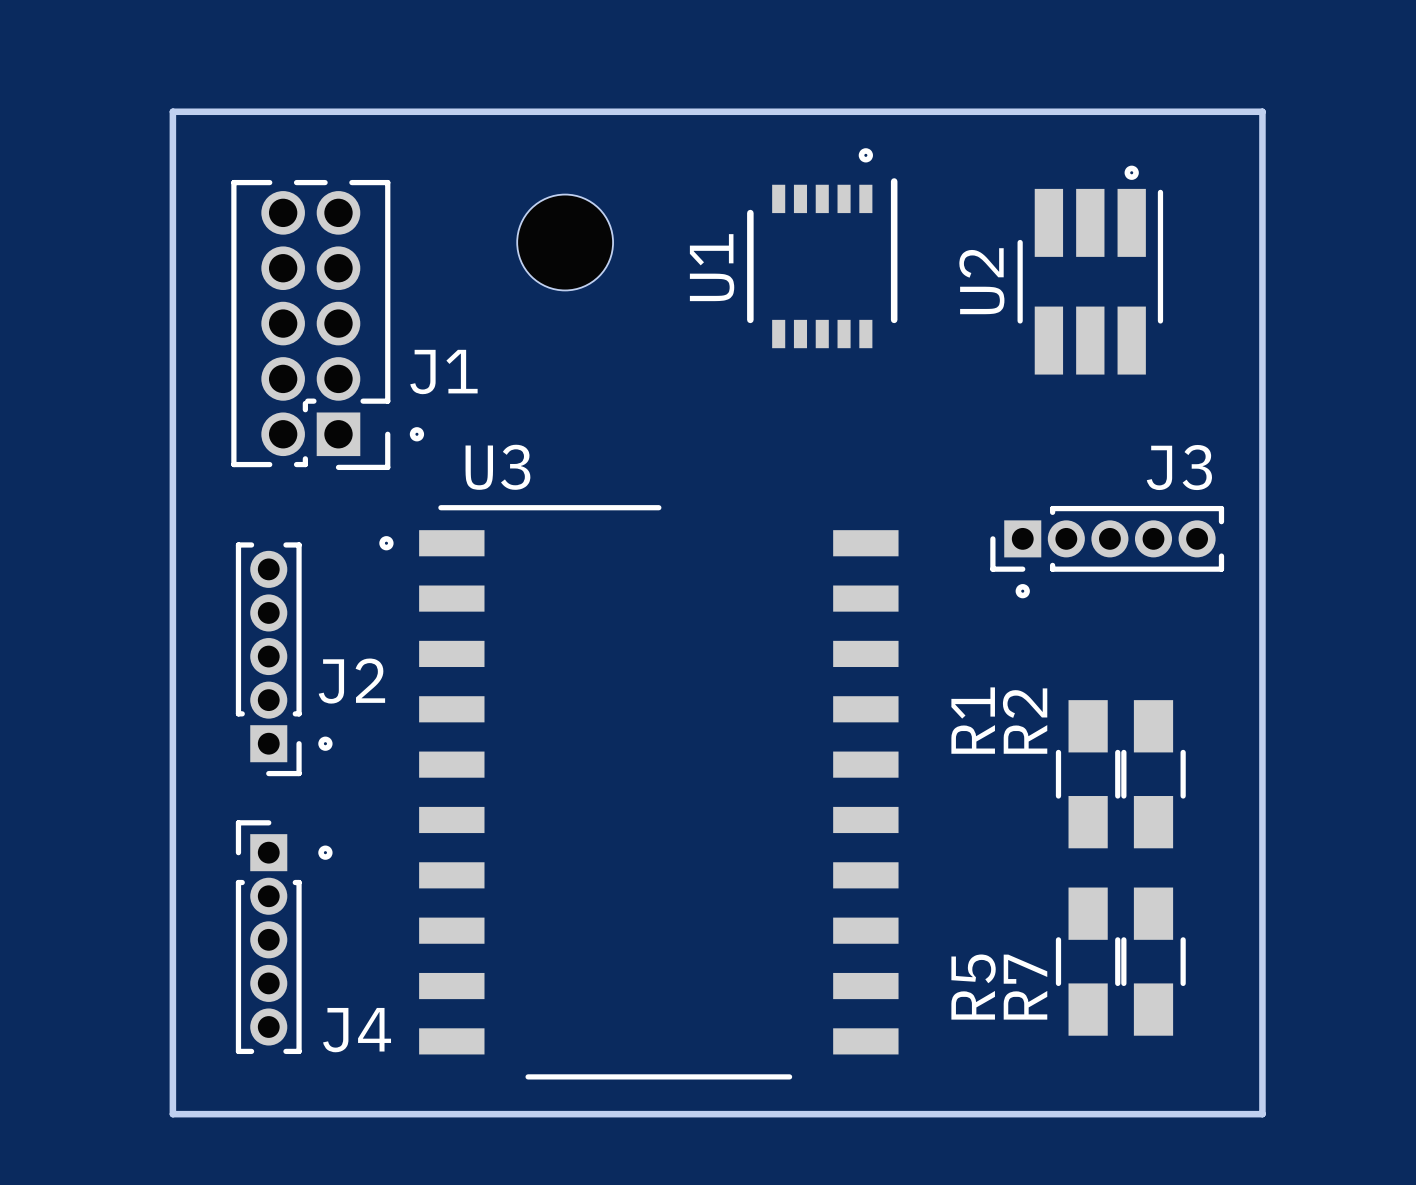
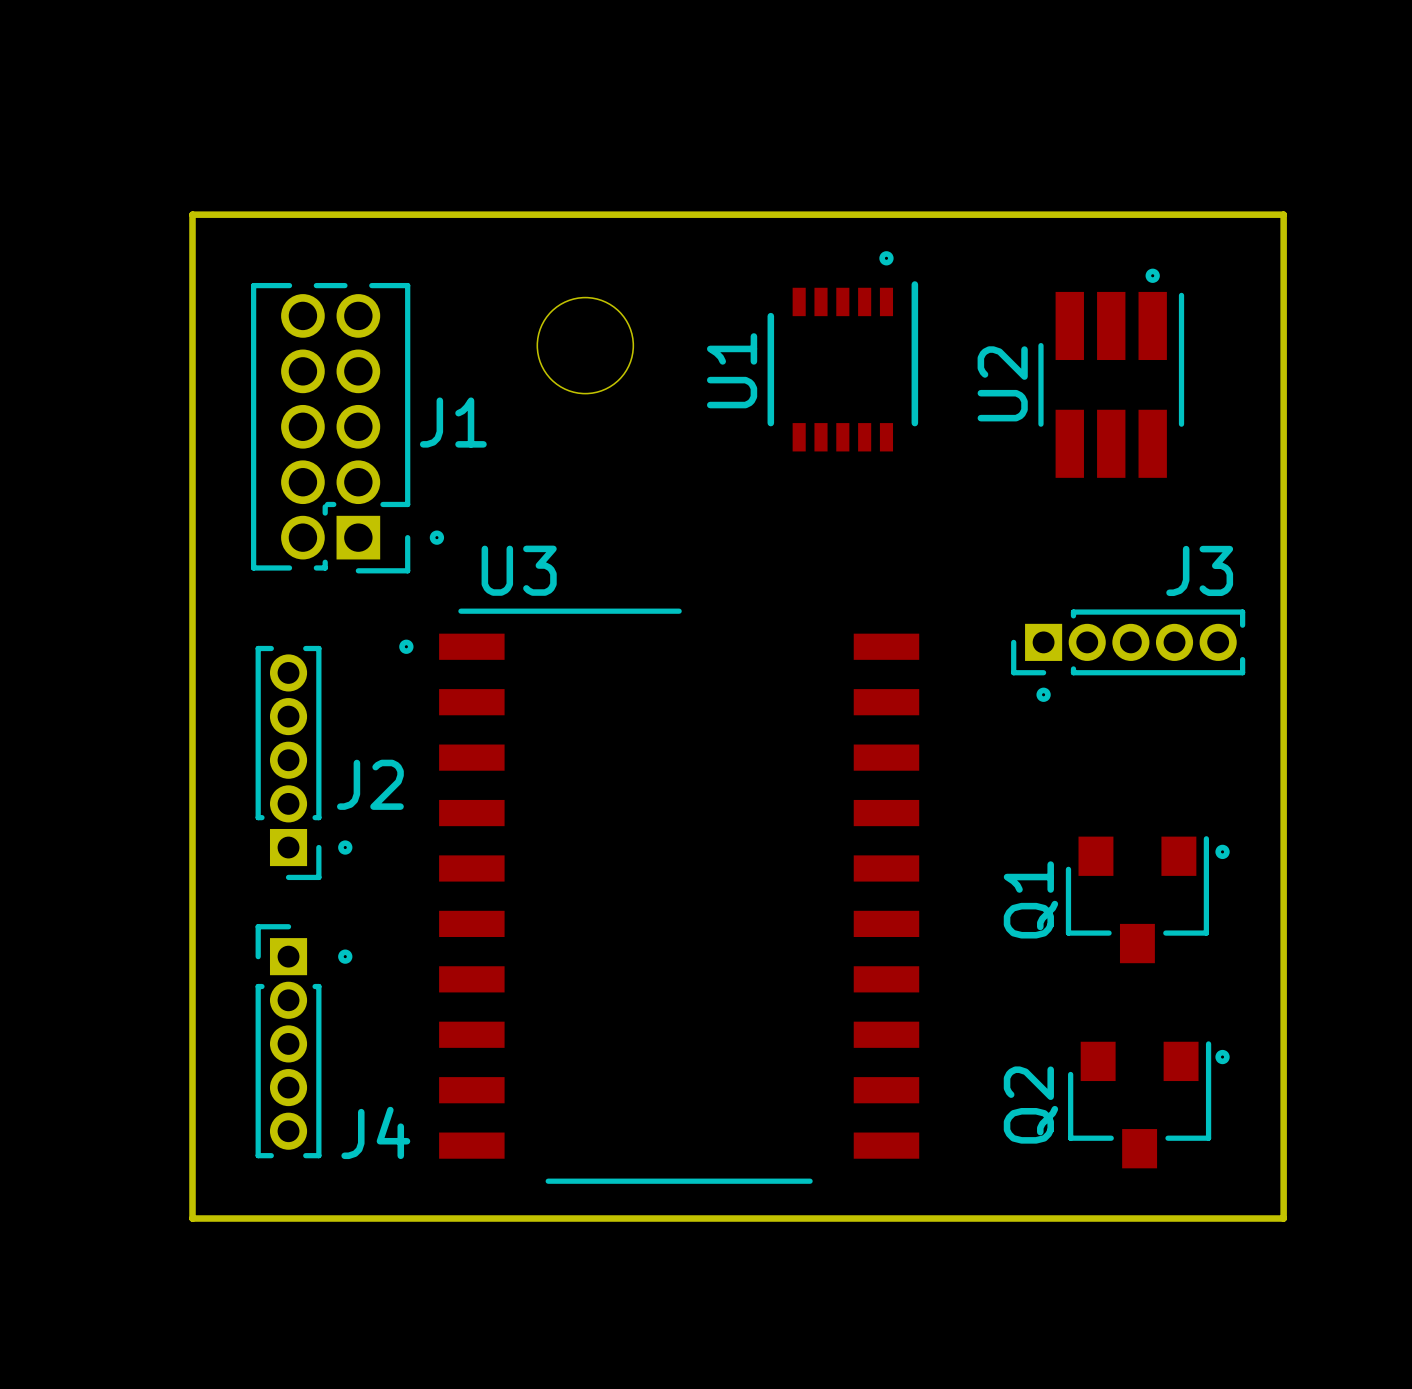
J1 name position: J1 (443, 372) -> J1 (453, 422)
drawing: none -> [1215, 844, 1230, 860]
R1: (1088, 774) -> none
R2: (1153, 774) -> none
Q1: none -> (1137, 899)
drawing: none -> [1215, 1049, 1230, 1065]
R5: (1088, 961) -> none
R7: (1153, 961) -> none
Q2: none -> (1139, 1104)

